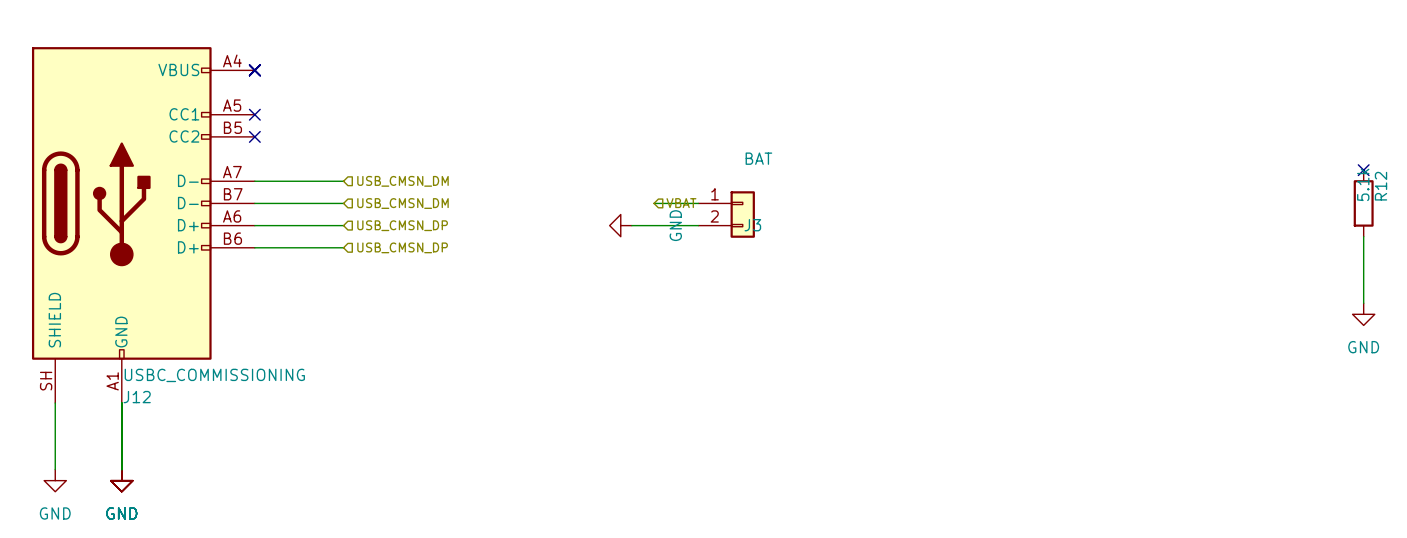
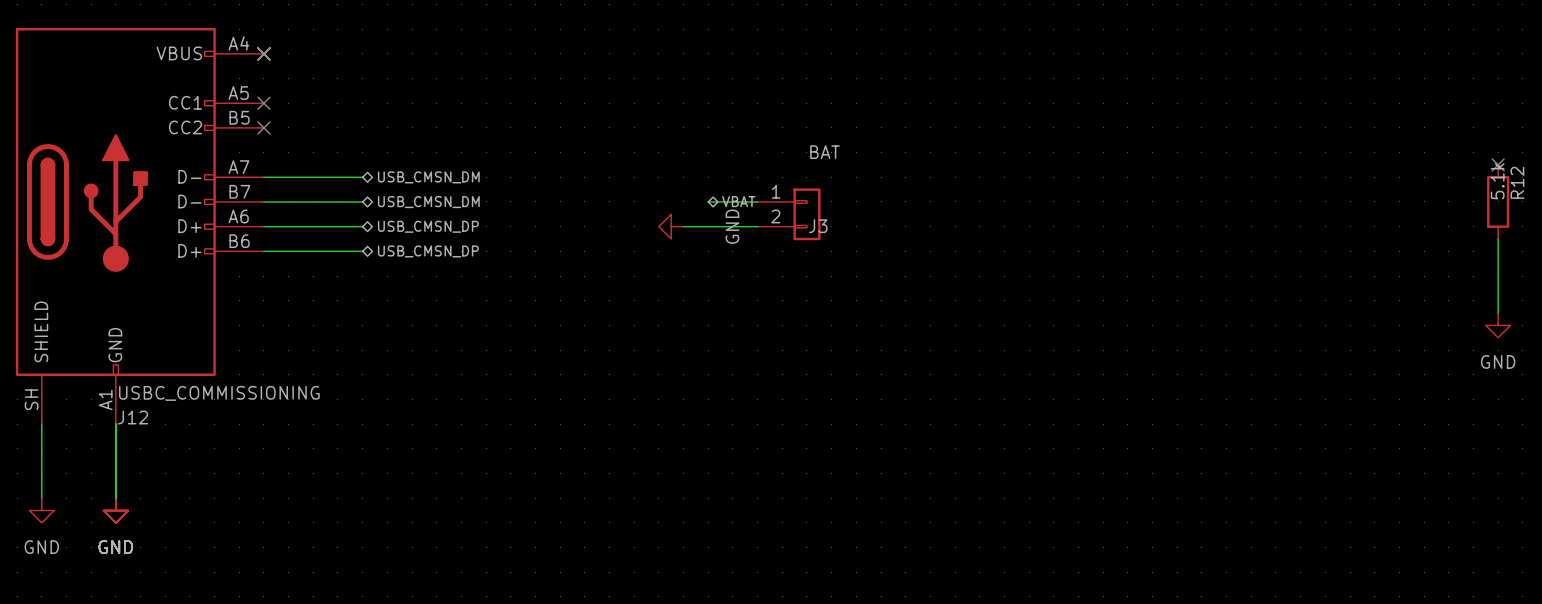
hierarchical label shape: input (402, 181) -> bidirectional (428, 177)
hierarchical label shape: input (402, 203) -> bidirectional (428, 202)
hierarchical label shape: input (681, 203) -> bidirectional (738, 201)
hierarchical label shape: input (402, 225) -> bidirectional (428, 226)
hierarchical label shape: input (402, 247) -> bidirectional (428, 251)

